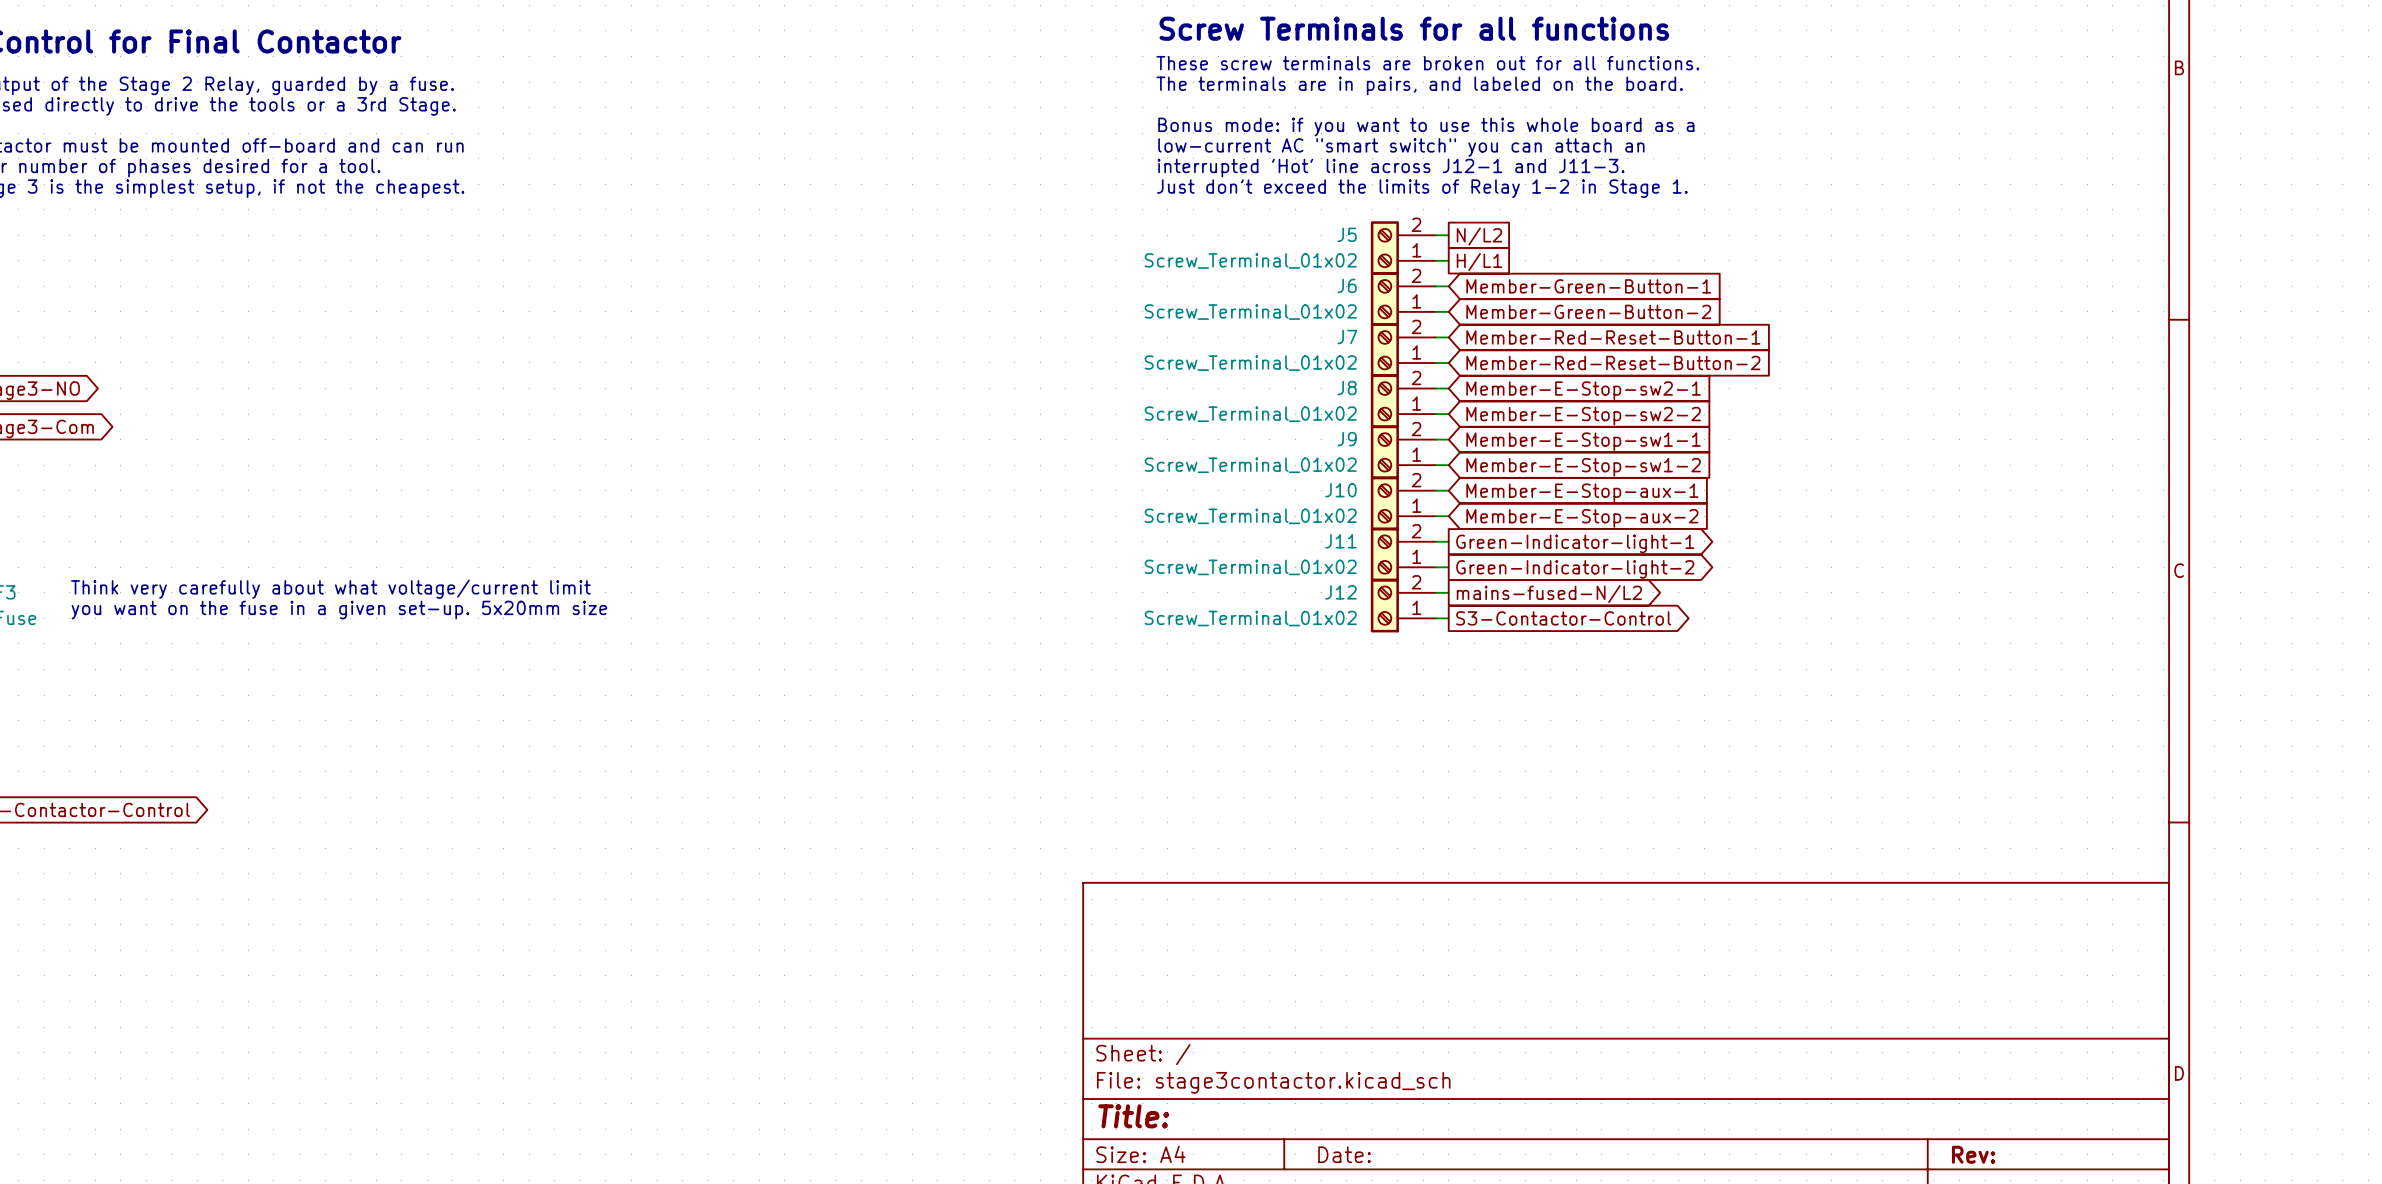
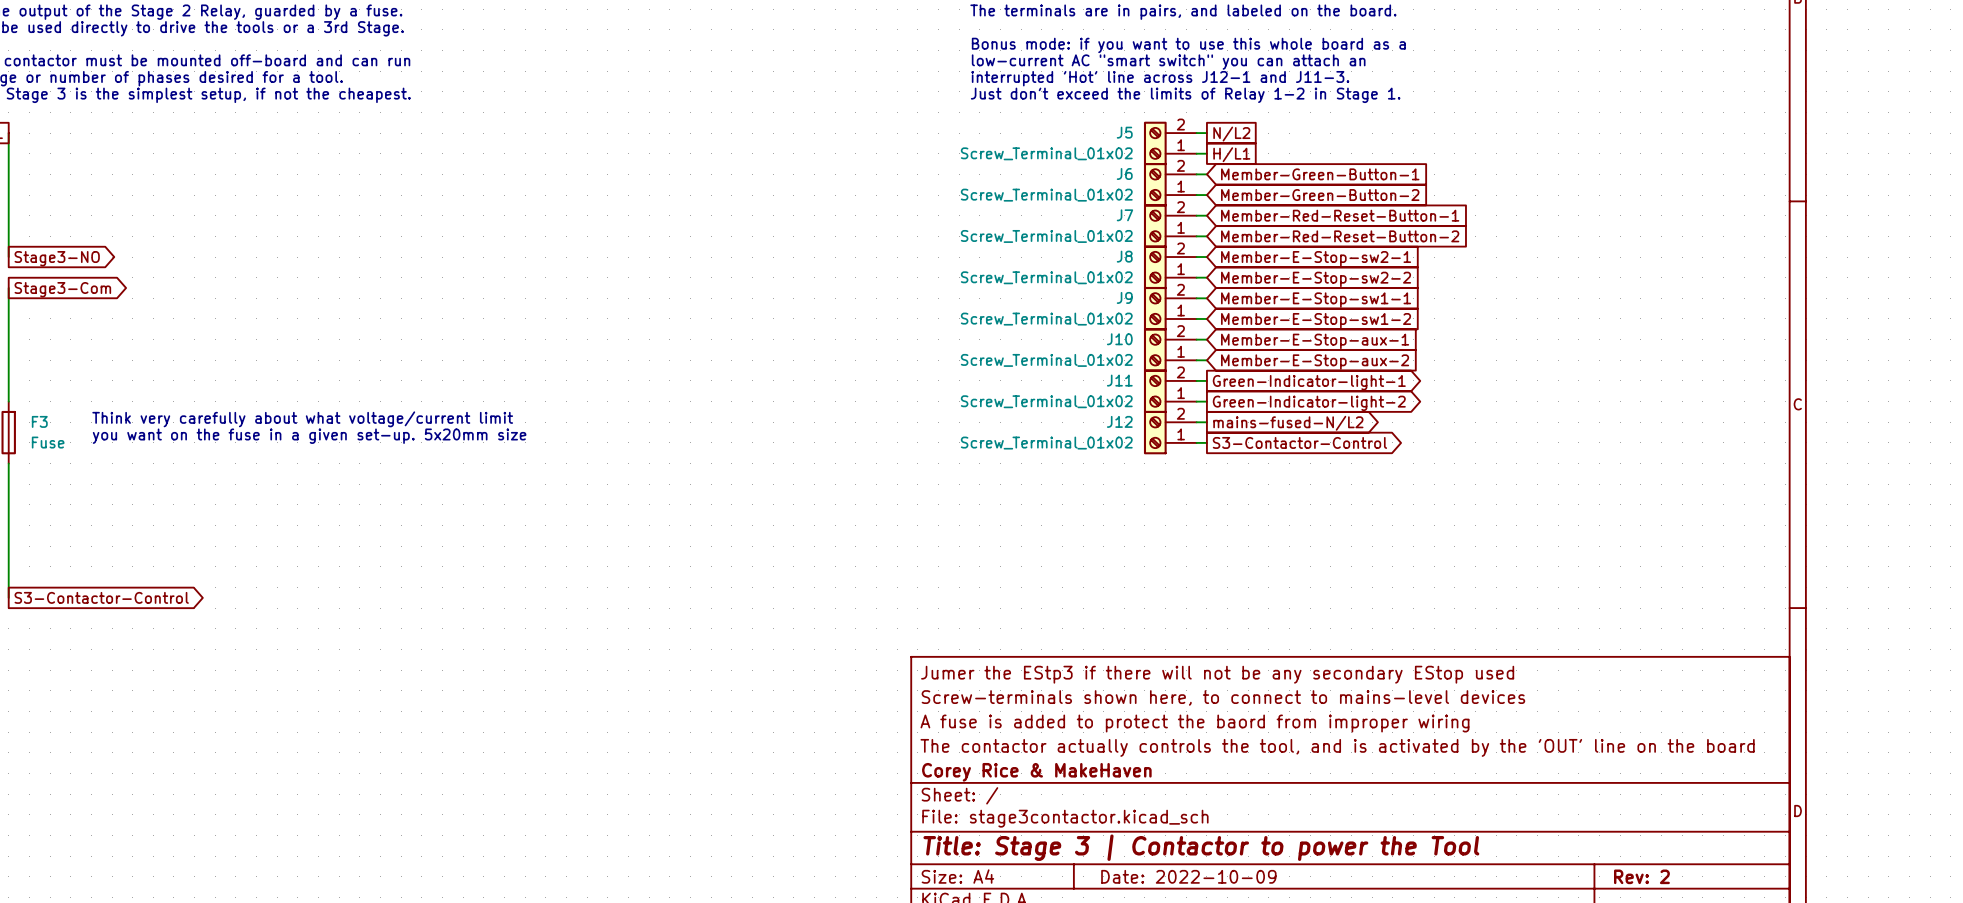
title block: none -> Jumer the EStp3 if there will not be any secondary EStop used (1217, 674)
title block: none -> Screw-terminals shown here, to connect to mains-level devices (1223, 697)
title block: none -> A fuse is added to protect the baord from improper wiring (1194, 723)
title block: none -> The contactor actually controls the tool, and is activated by the 'OUT' line on the board (1337, 747)
title block: none -> Corey Rice & MakeHaven (1036, 772)
title block: Title: (1133, 1116) -> Title: Stage 3 | Contactor to power the Tool (1201, 847)
title block: Date: (1344, 1154) -> Date: 2022-10-09 (1188, 876)
title block: Rev: (1973, 1154) -> Rev: 2 (1641, 876)

